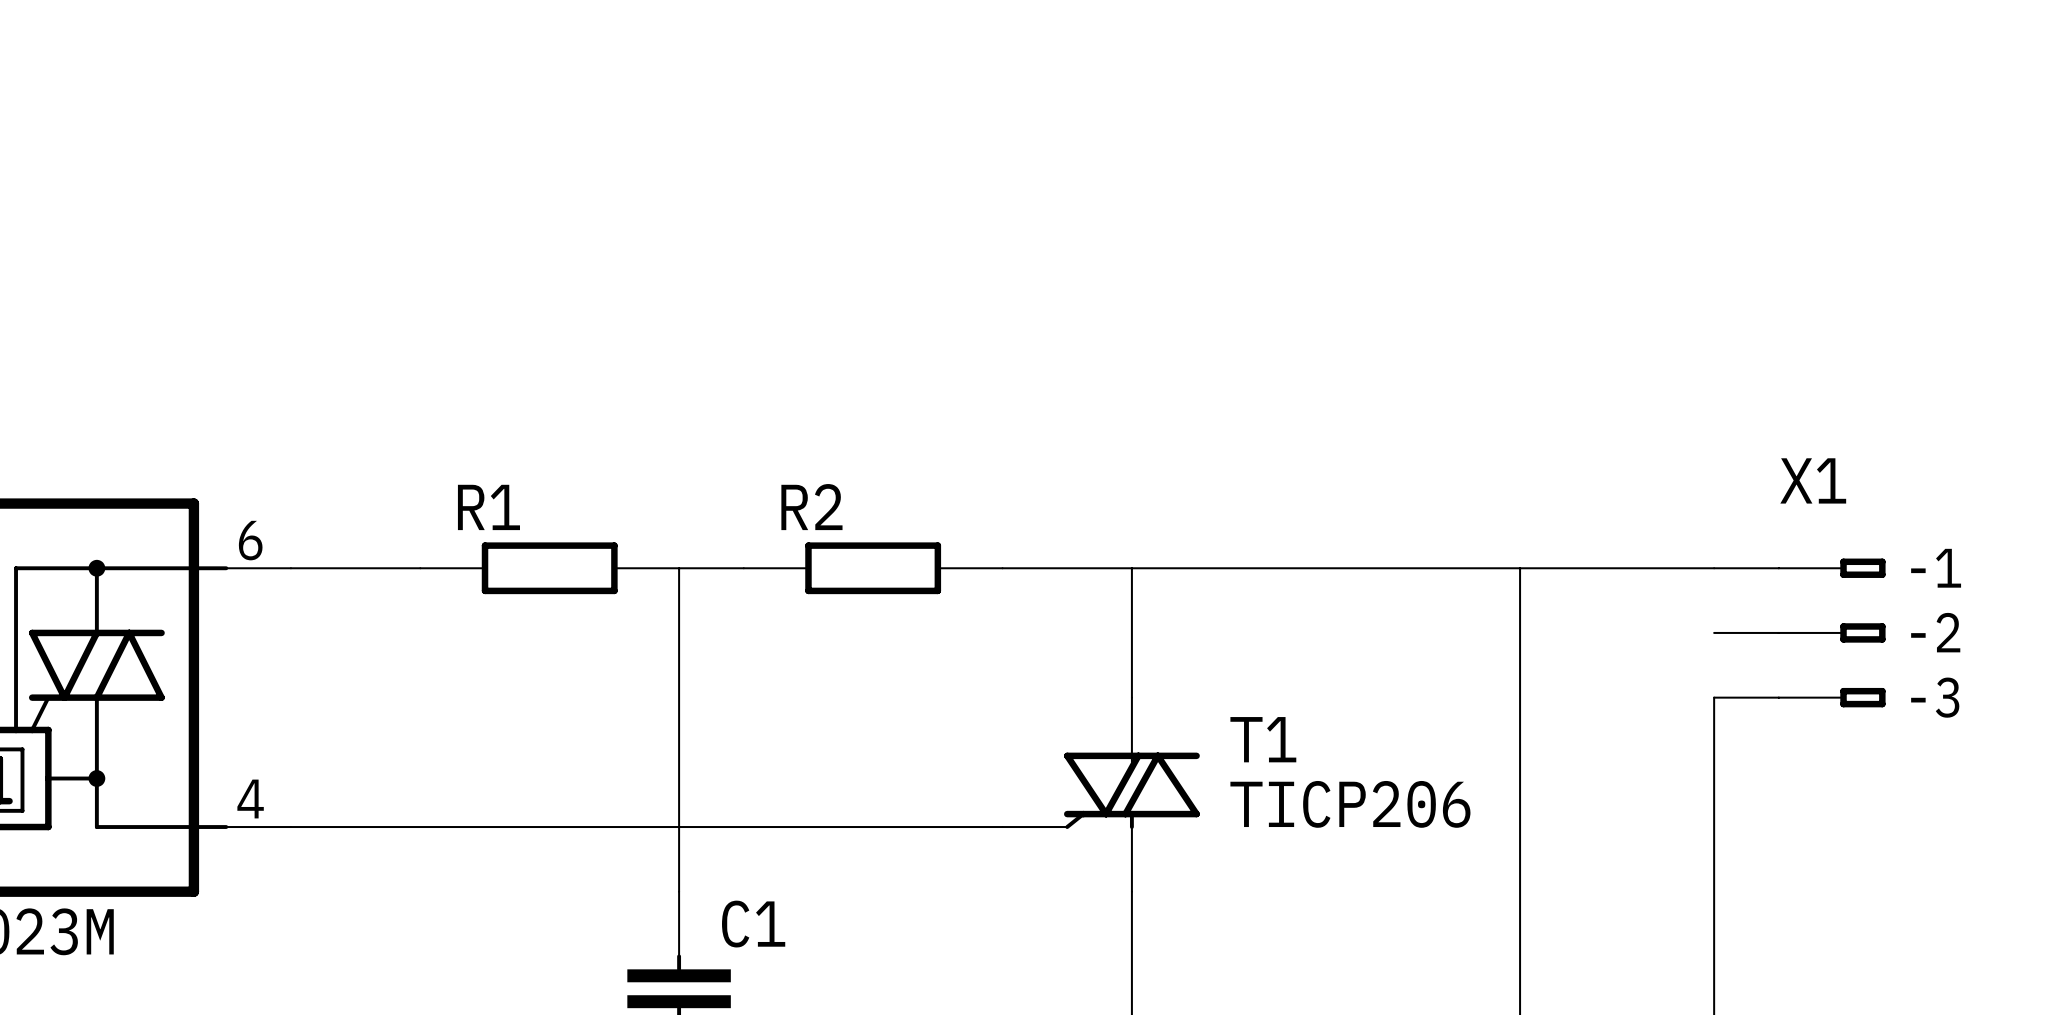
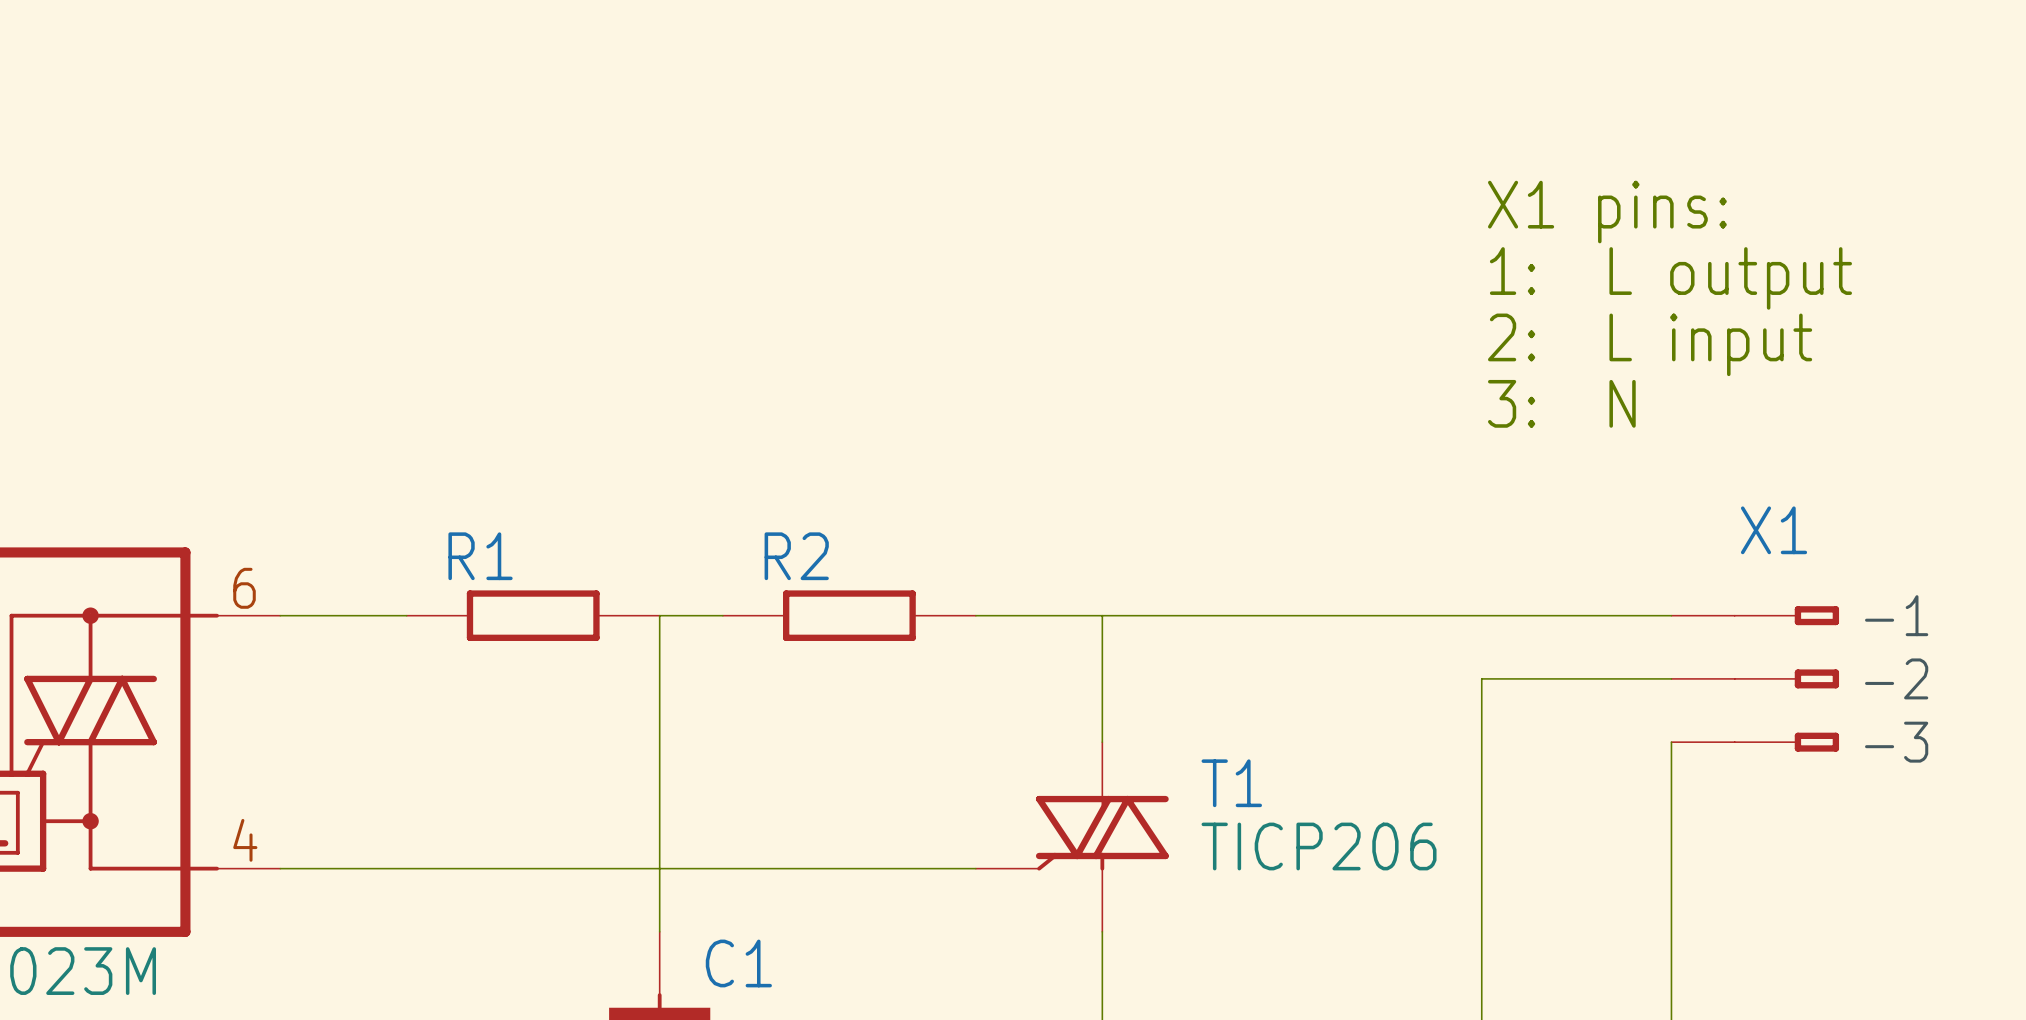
text: none -> X1 pins: (1607, 212)
text: none -> 1: L output (1670, 278)
text: none -> 2: L input (1650, 344)
text: none -> 3: N (1561, 403)
wire: (1520, 568) (1520, 632) -> (1671, 678) (1481, 678)

